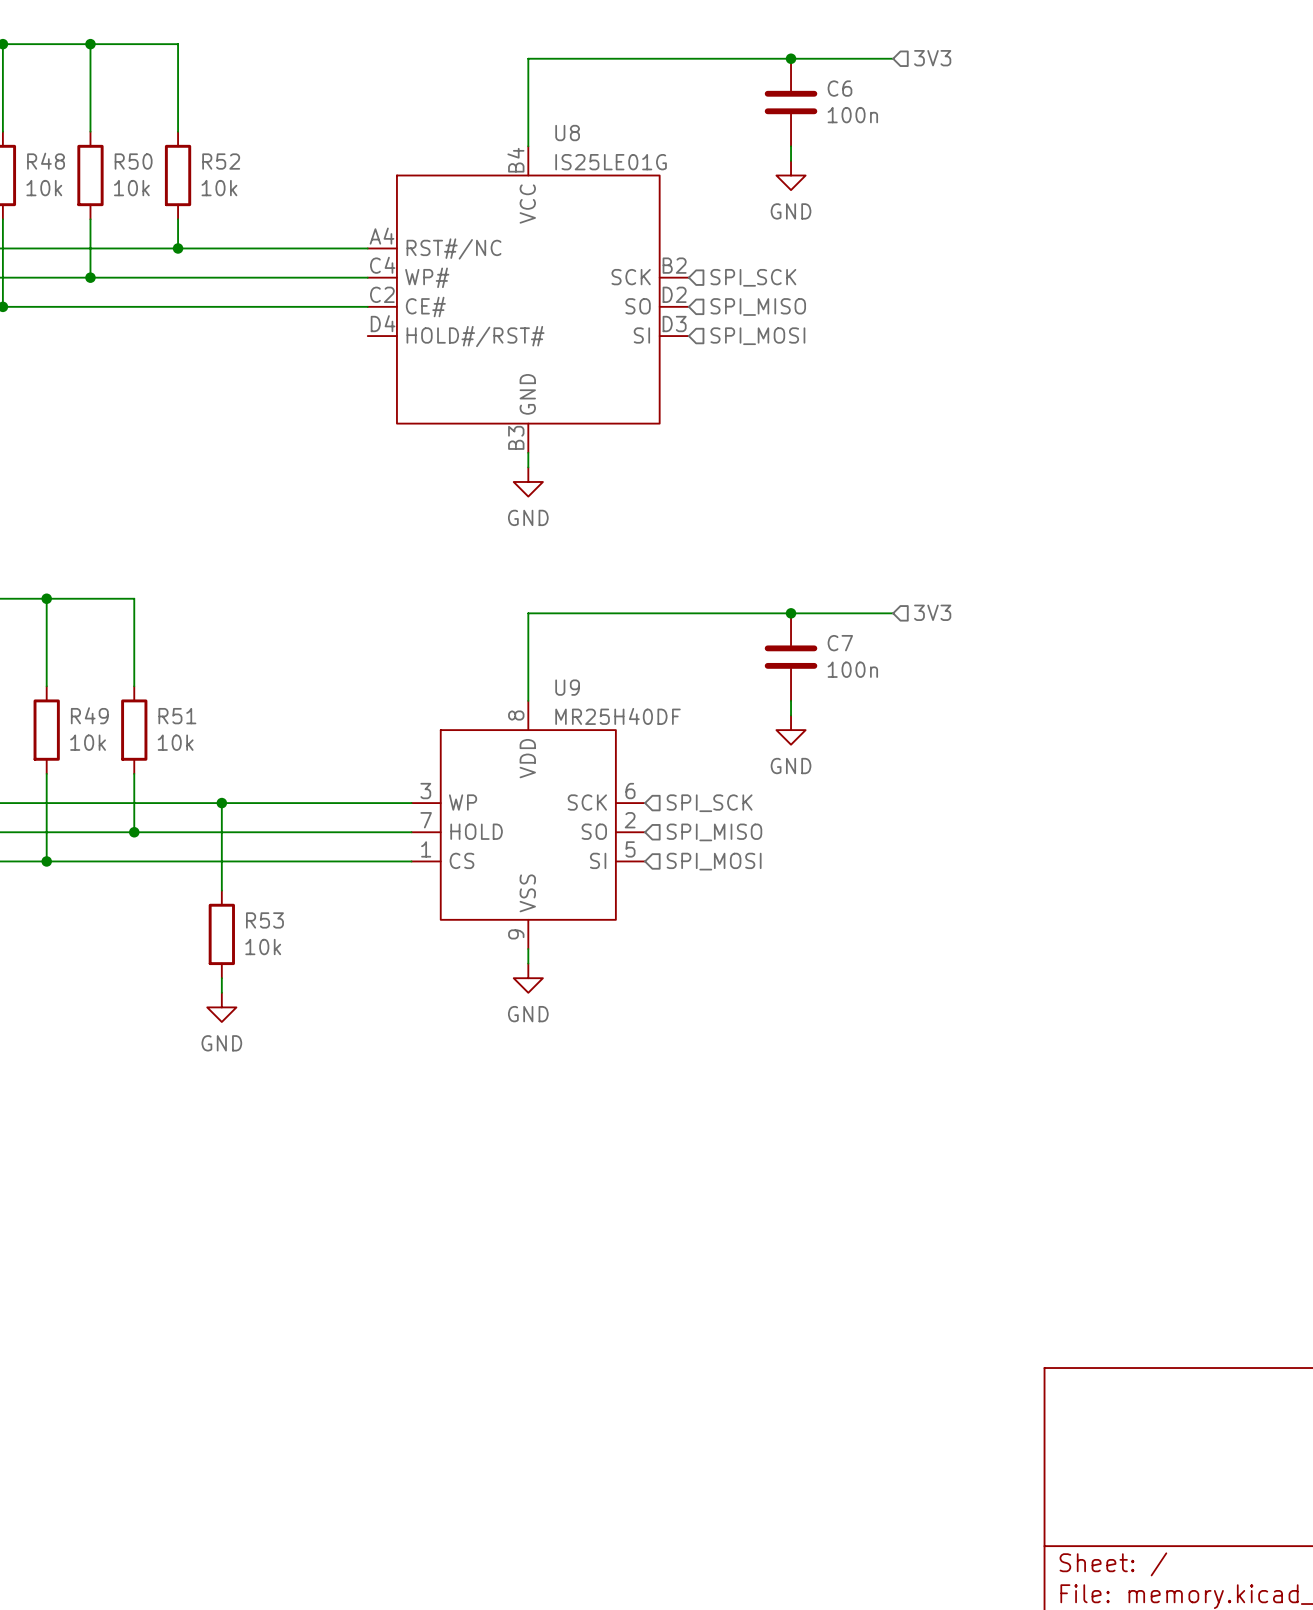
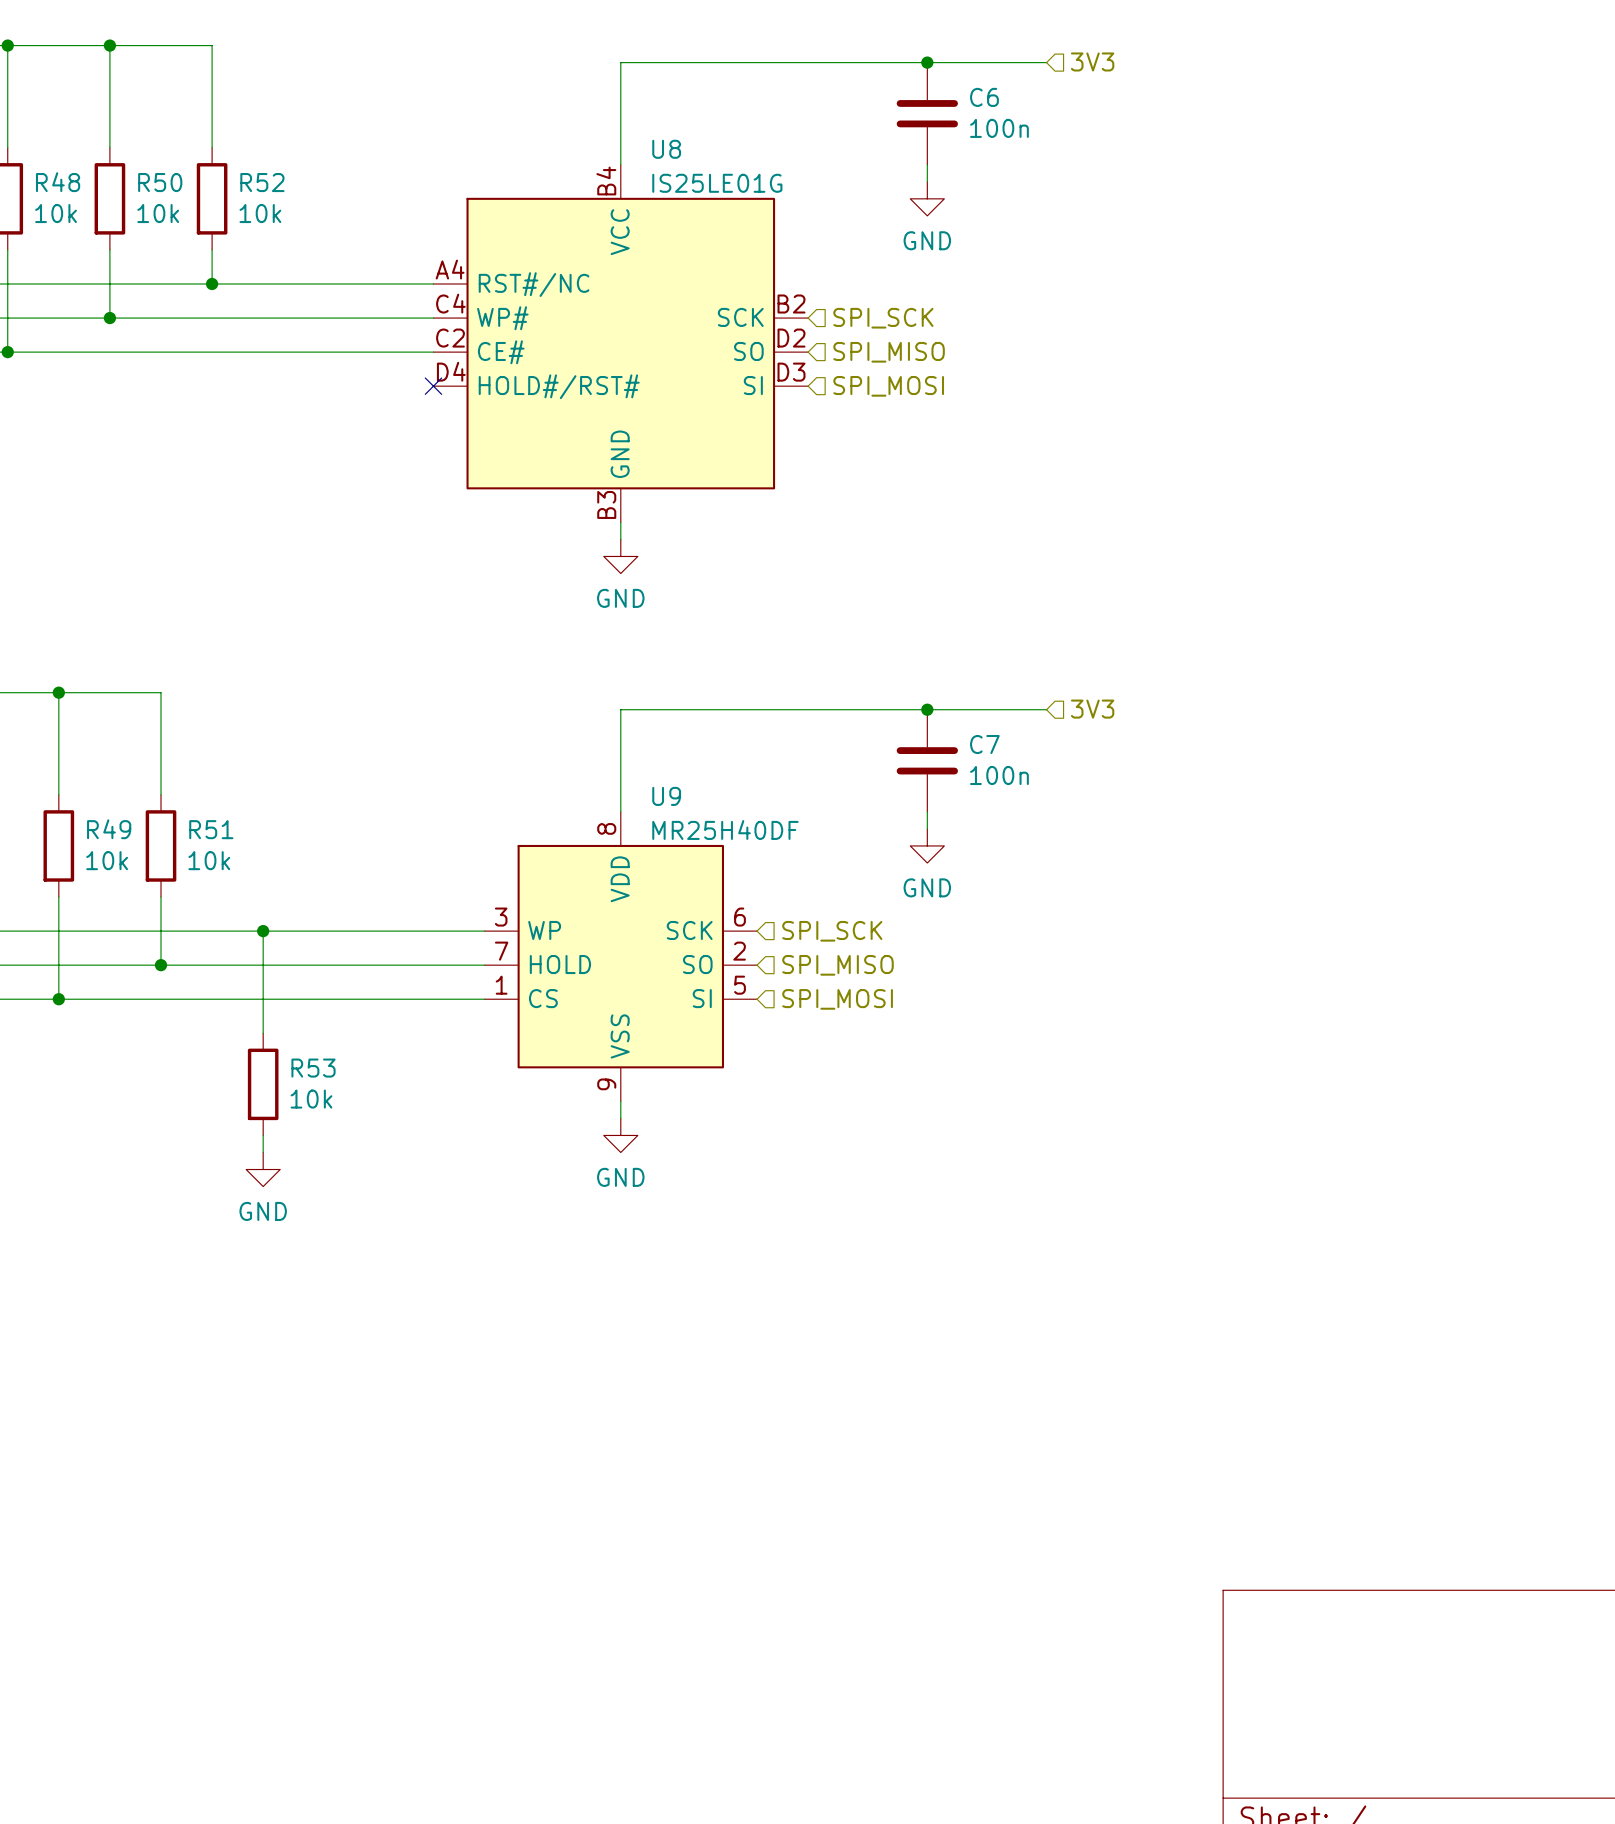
no-connect mark: none -> (433, 386)

